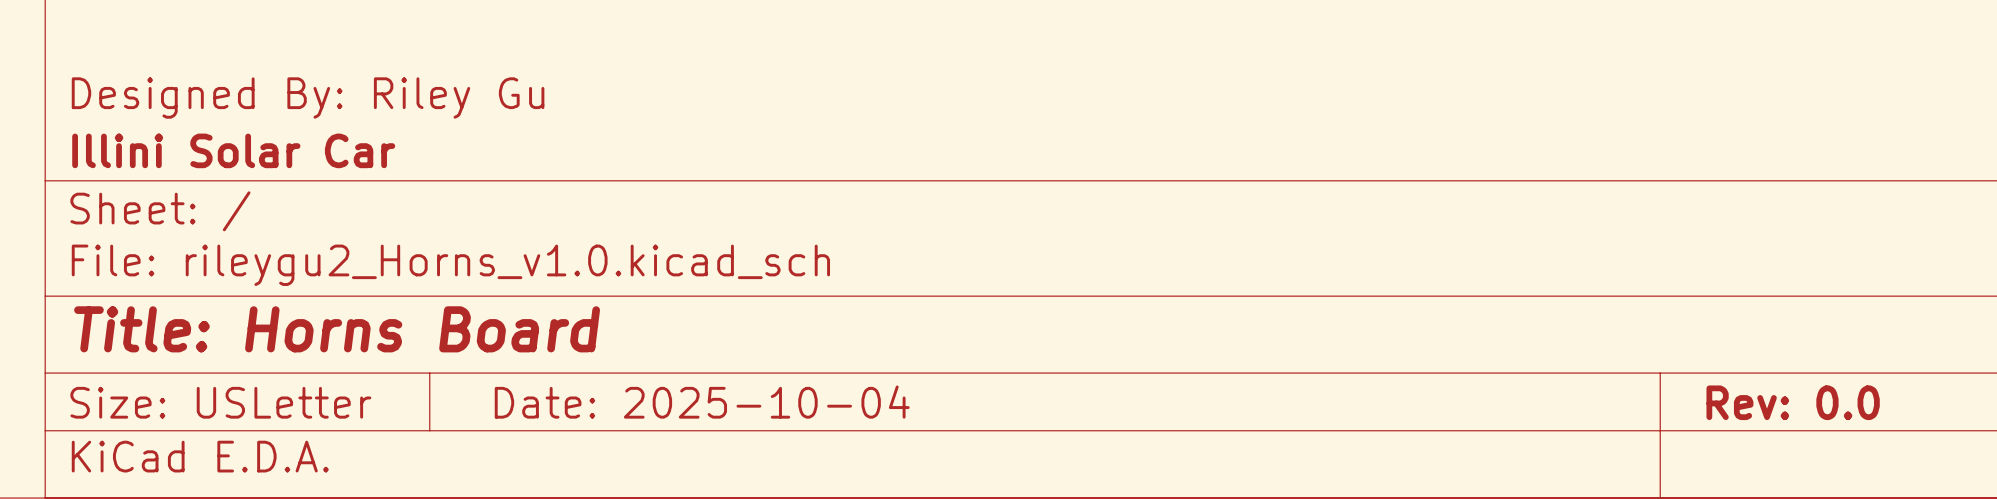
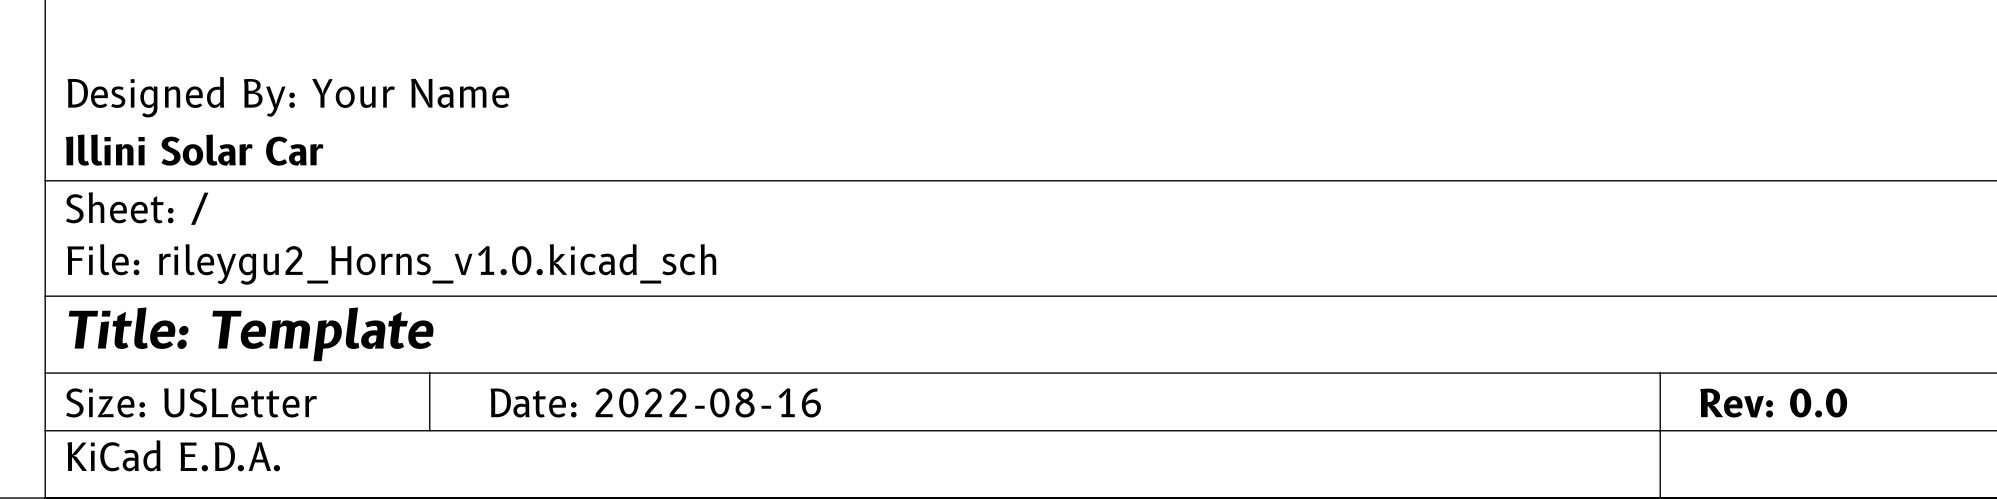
title block: Designed By: Riley Gu (308, 98) -> Designed By: Your Name (288, 97)
title block: Title: Horns Board (337, 329) -> Title: Template (251, 334)
title block: Date: 2025-10-04 (702, 402) -> Date: 2022-08-16 (655, 402)

